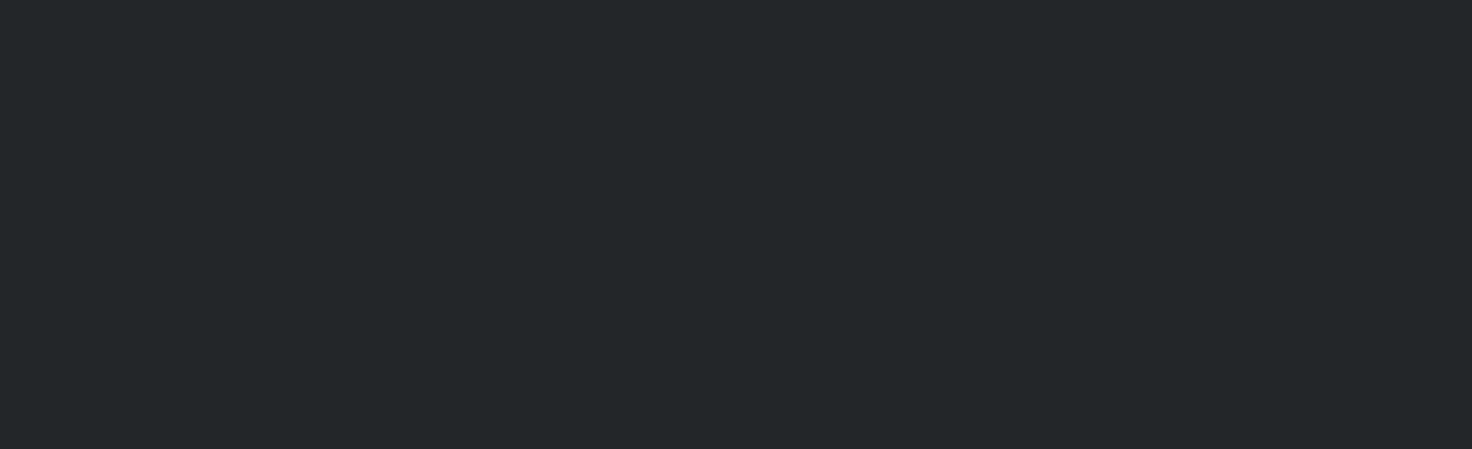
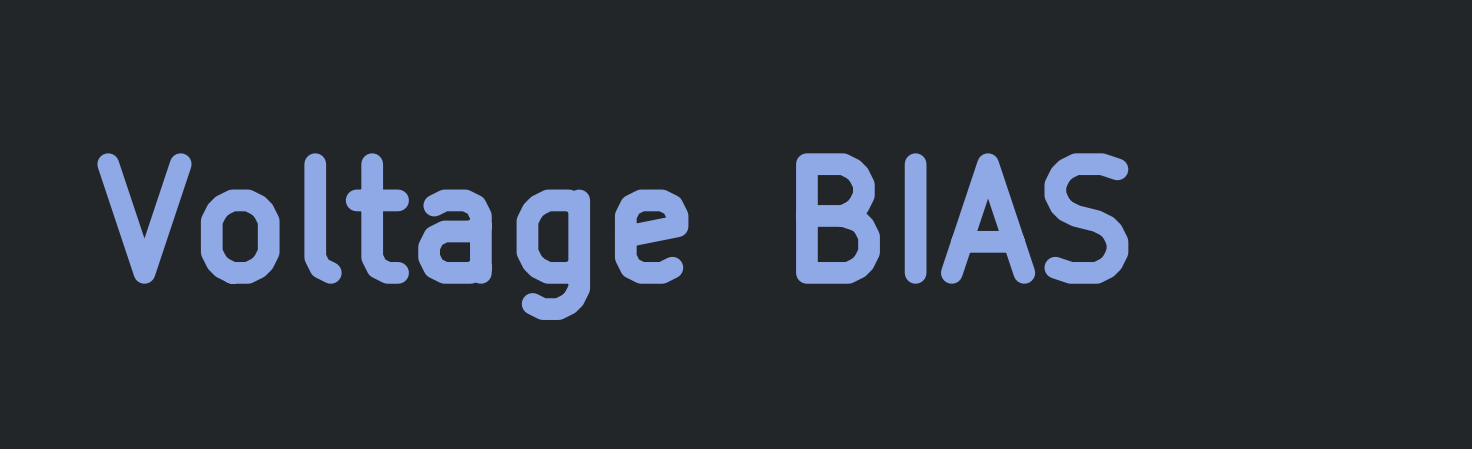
text: none -> Voltage BIAS (612, 236)

